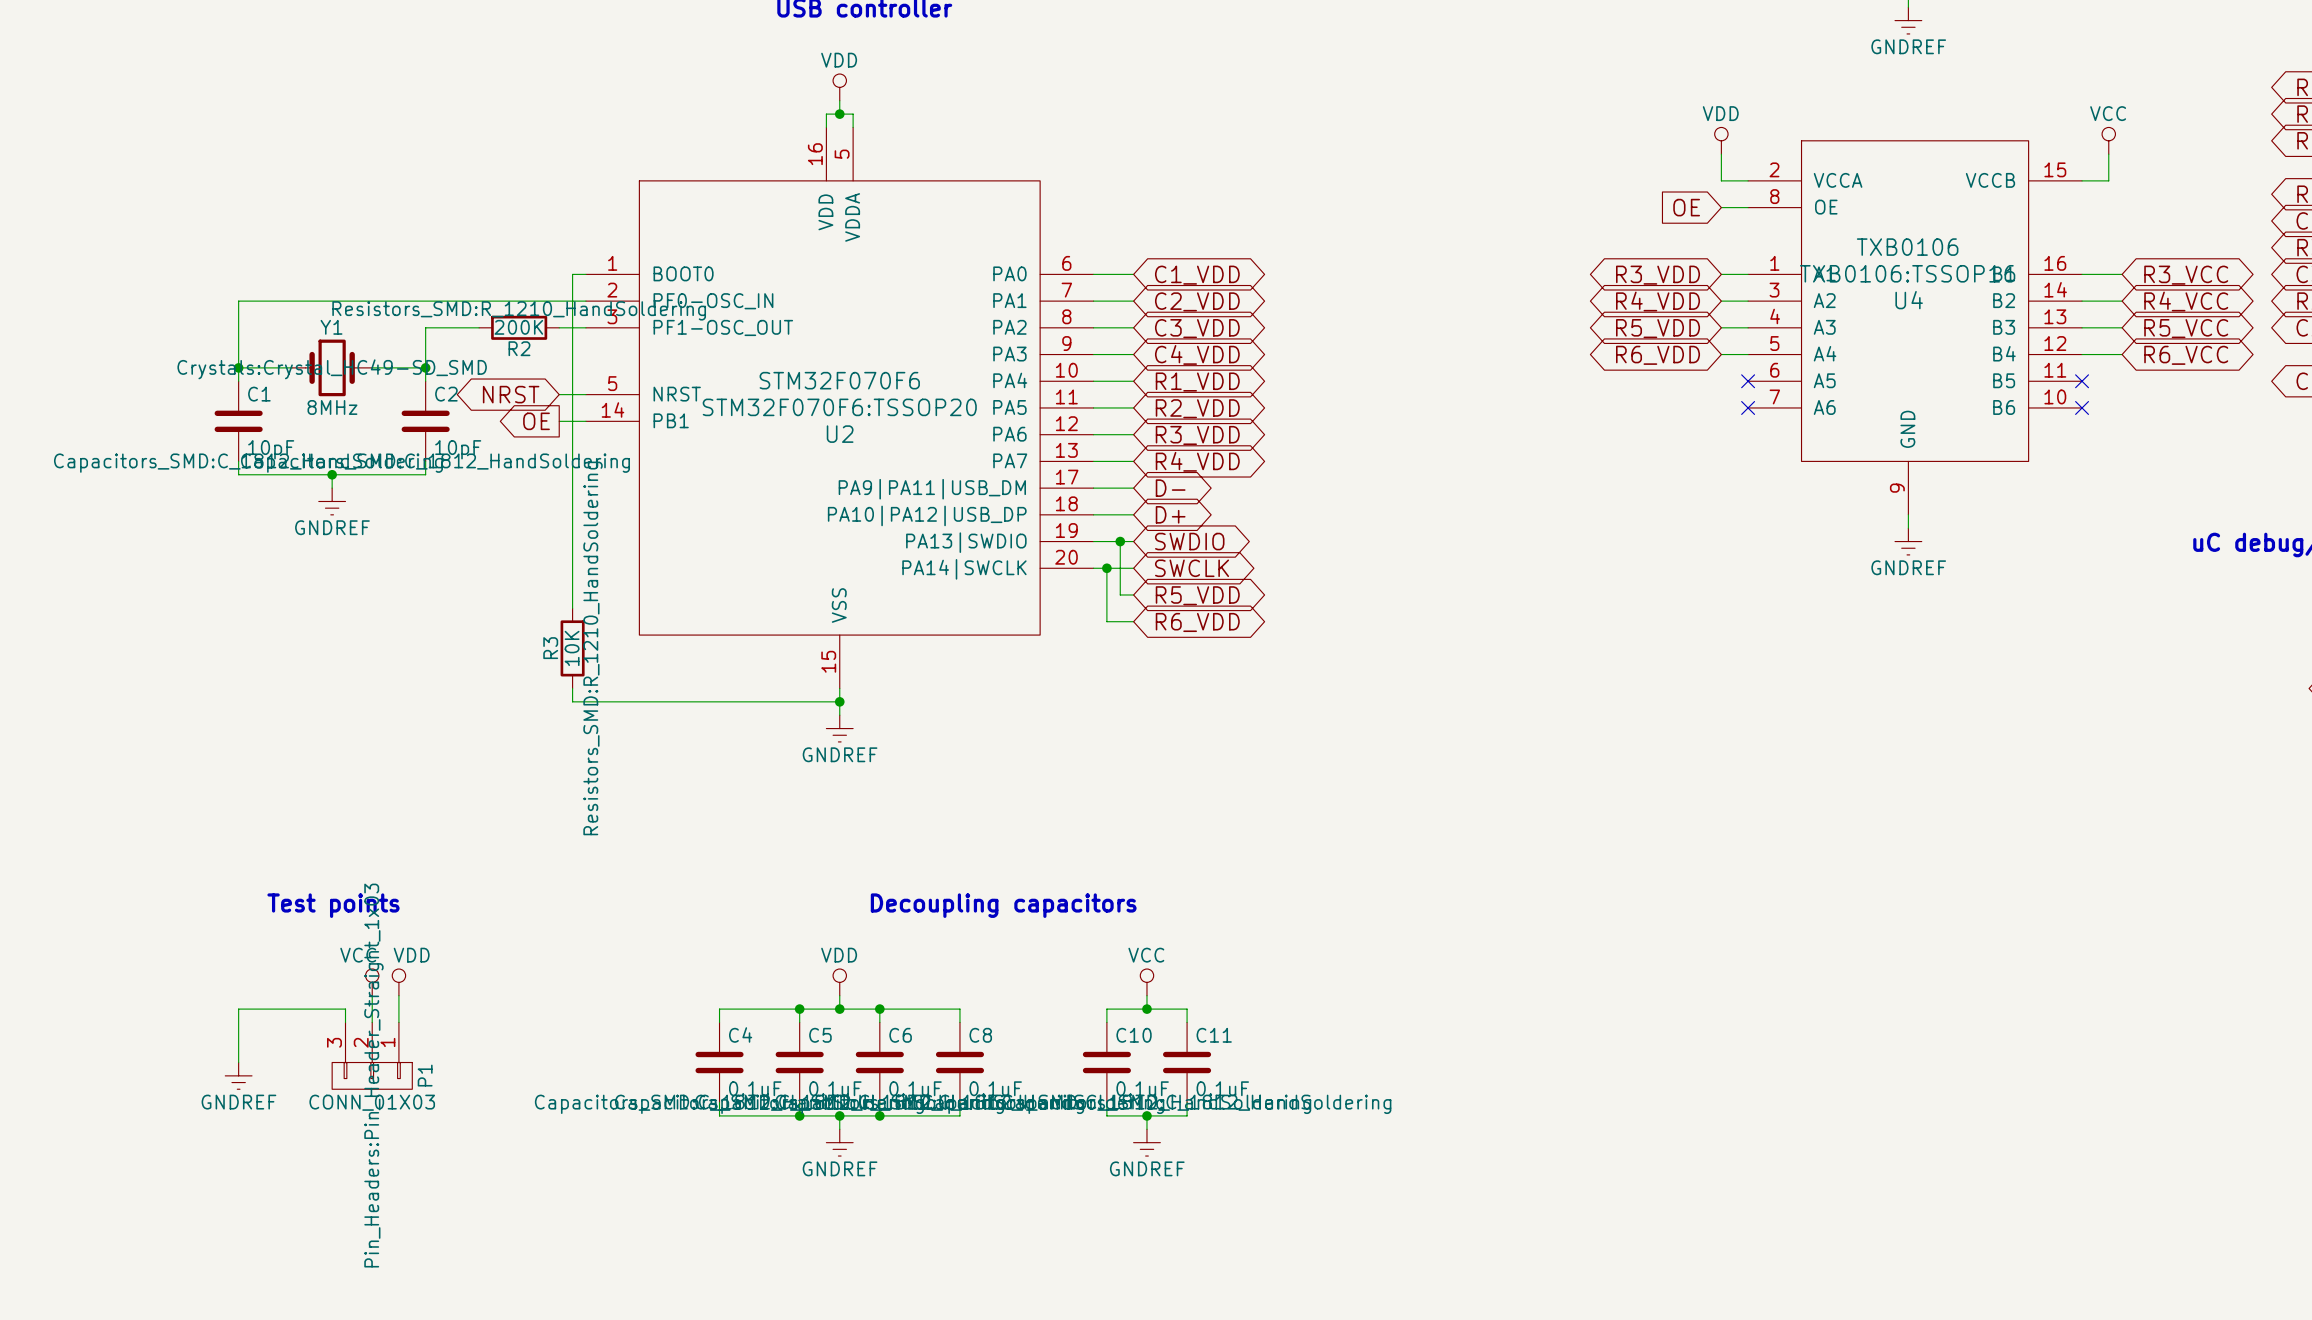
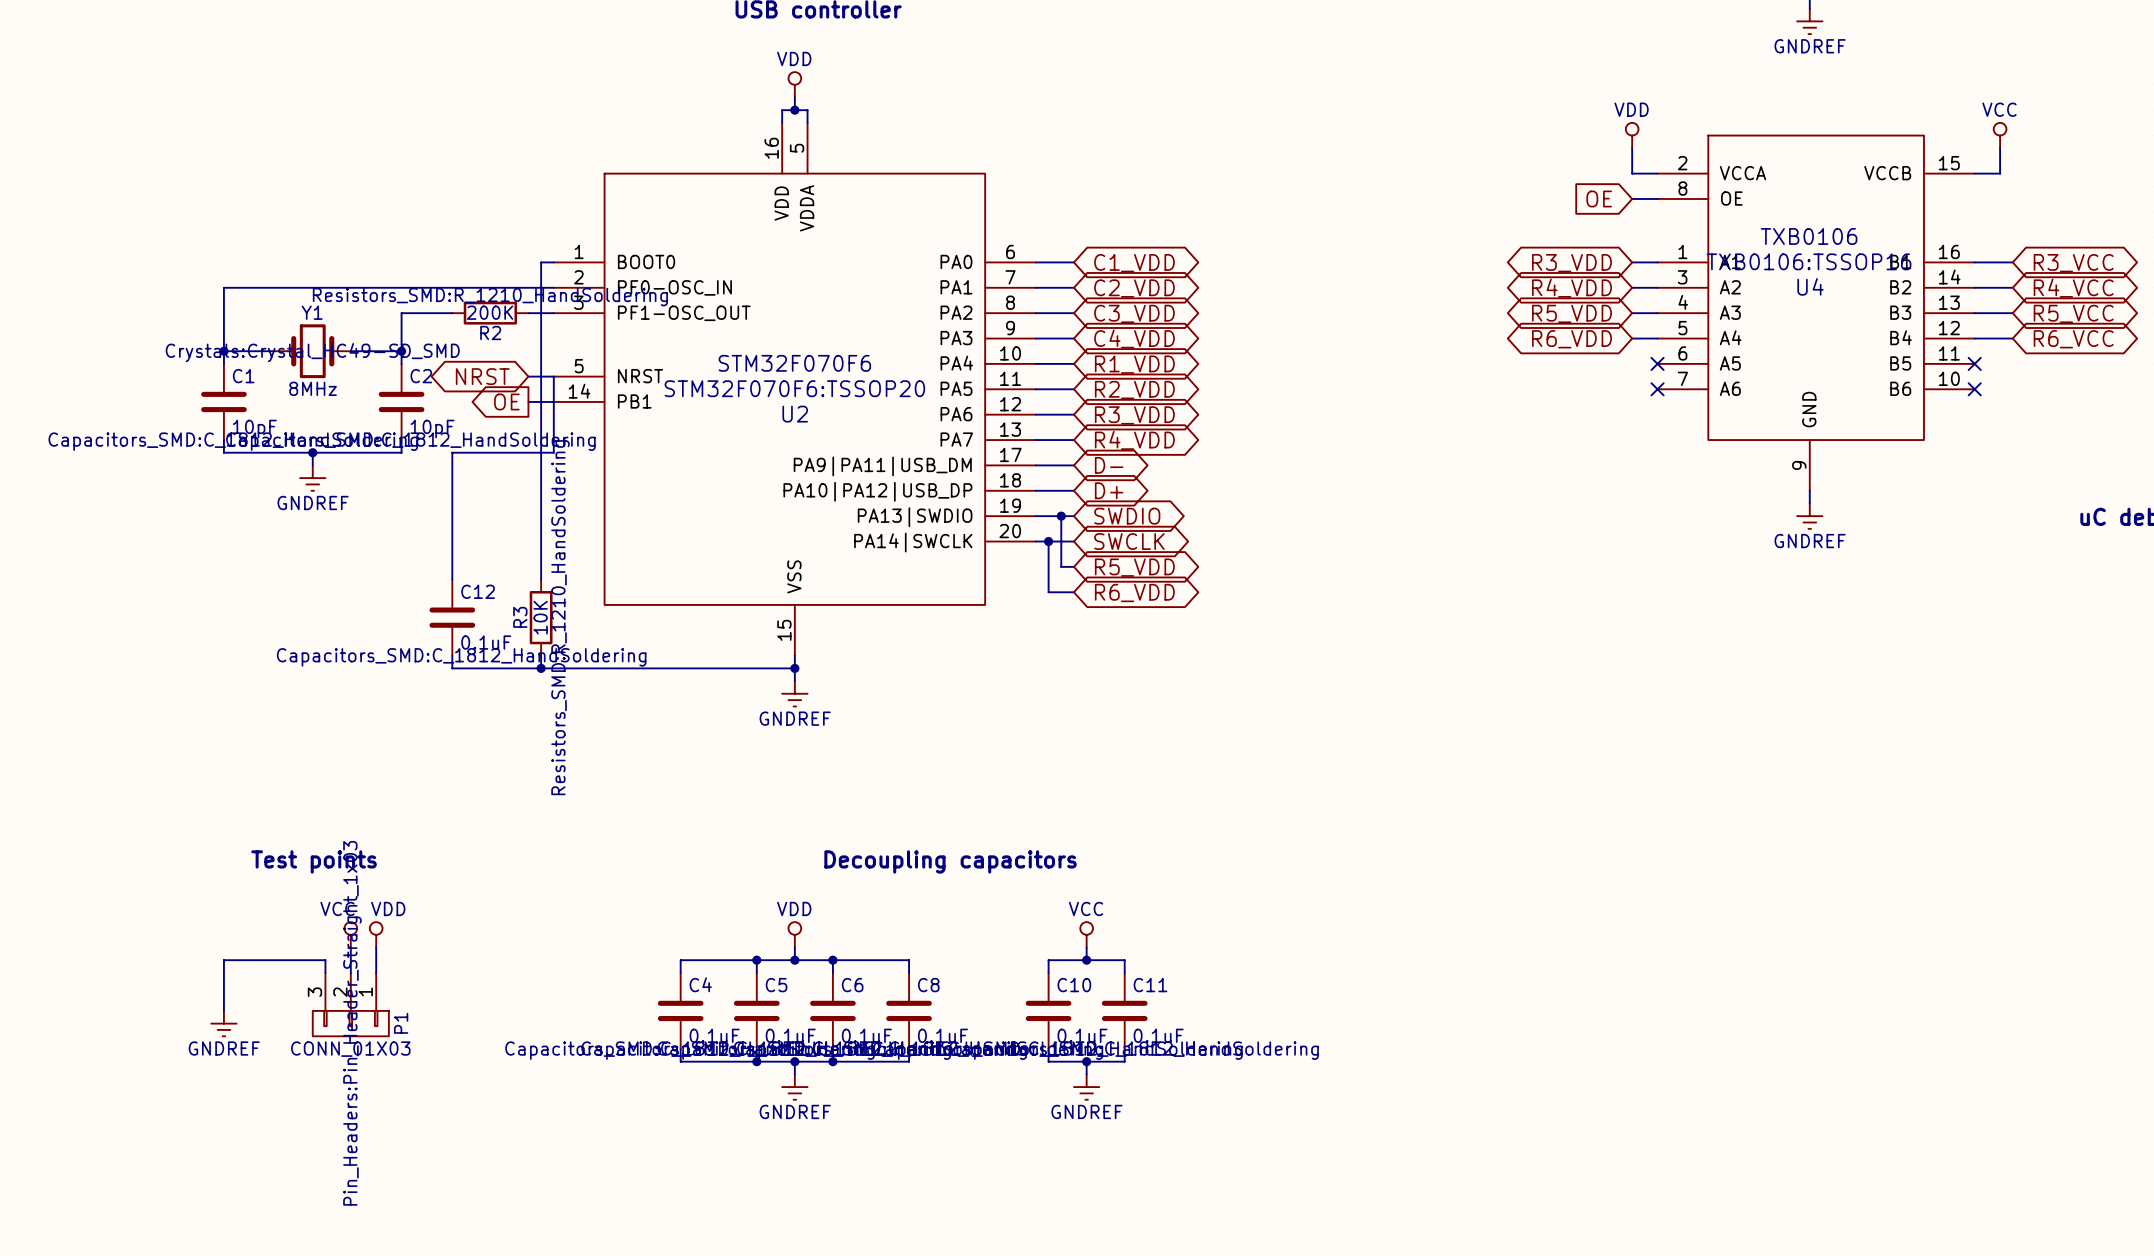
wire: none -> (553, 376) (553, 452) (452, 452) (452, 579)
C12: none -> 0.1uF (452, 617)
wire: none -> (452, 655) (452, 668) (541, 668)
junction: none -> (541, 668)

